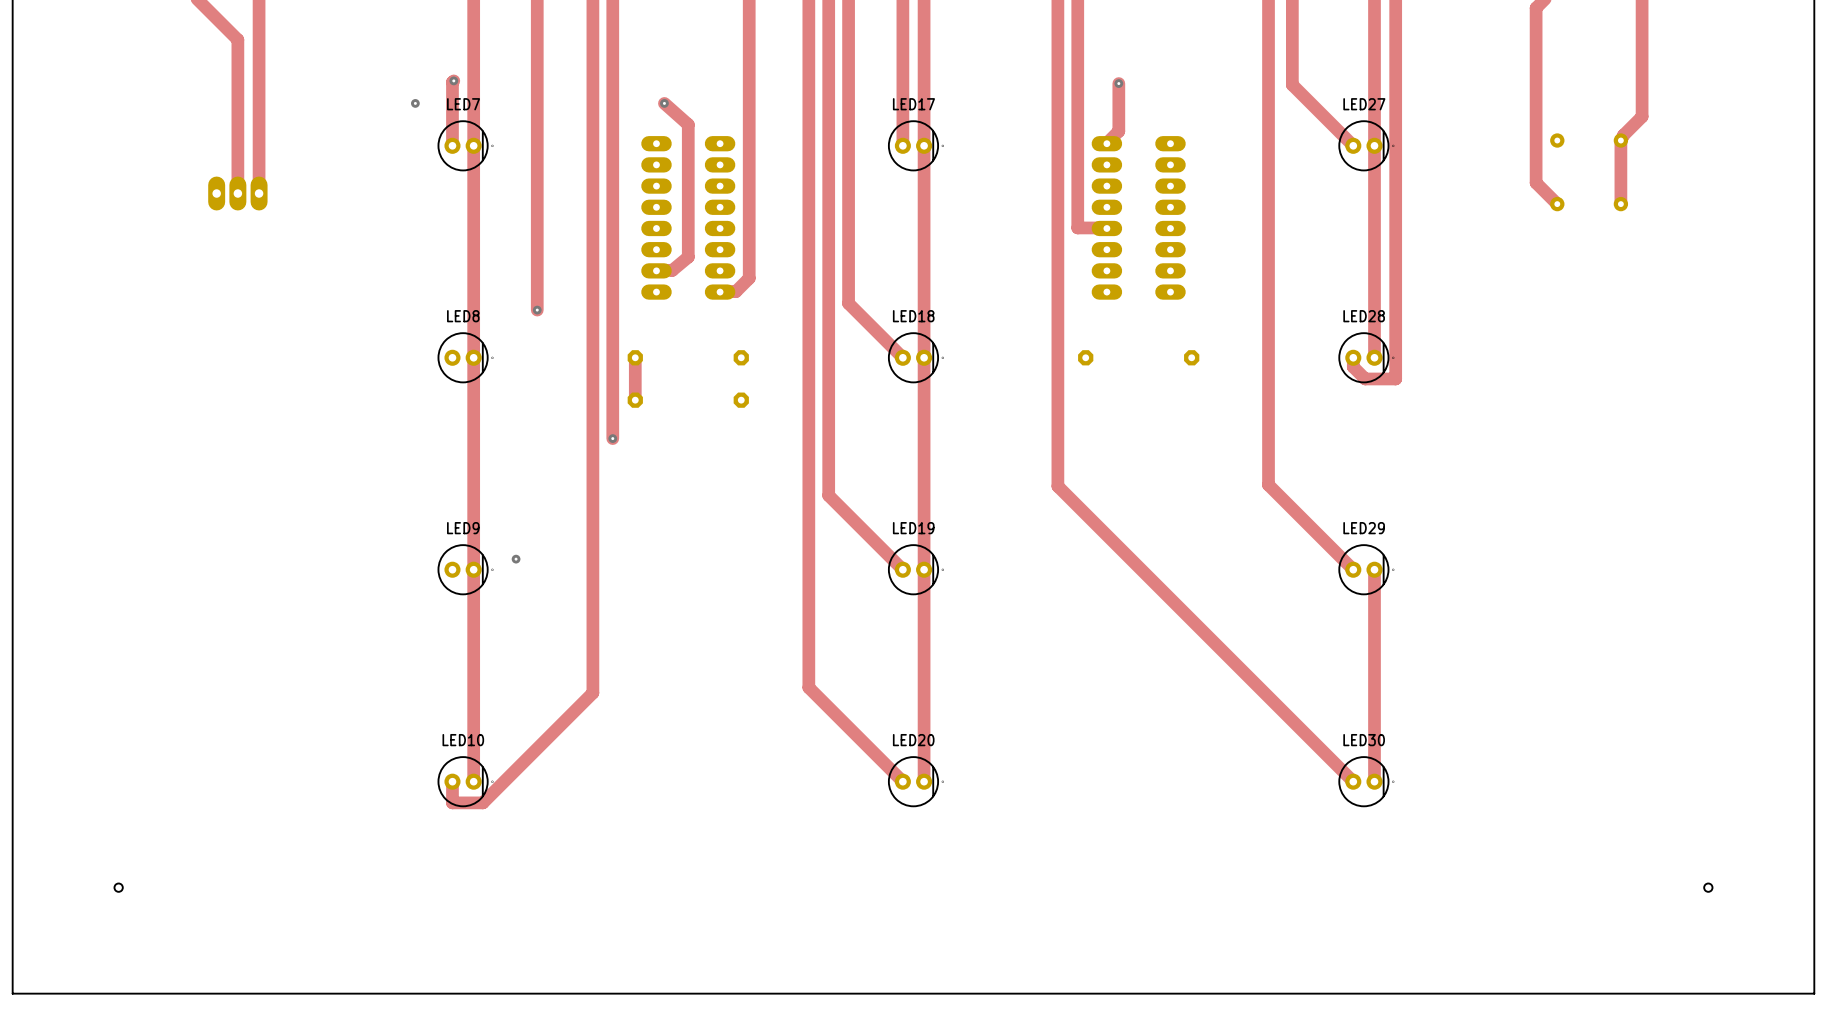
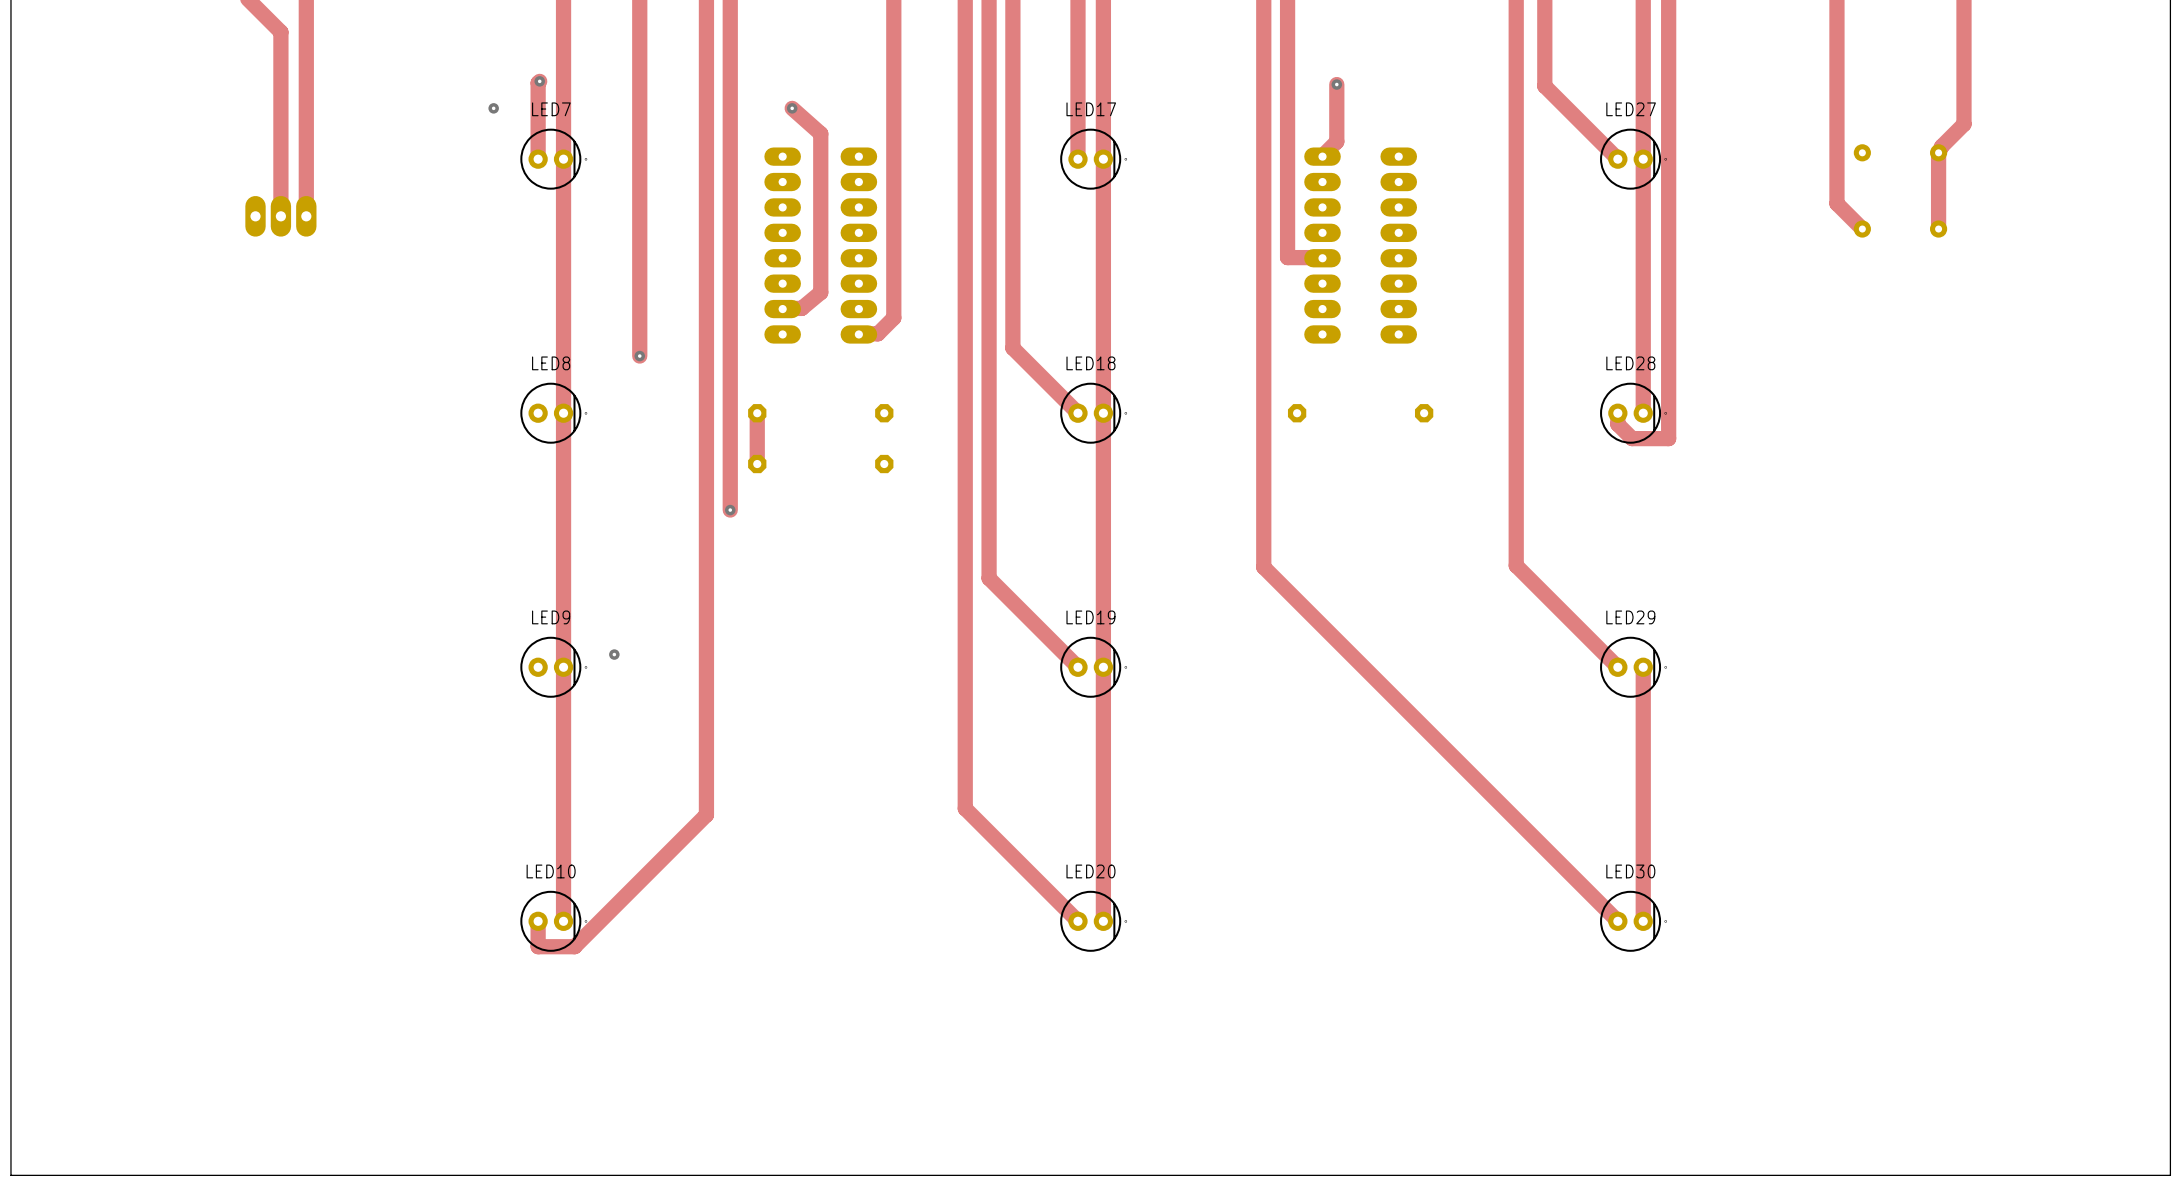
hole: (118, 887) -> none
hole: (1708, 887) -> none

